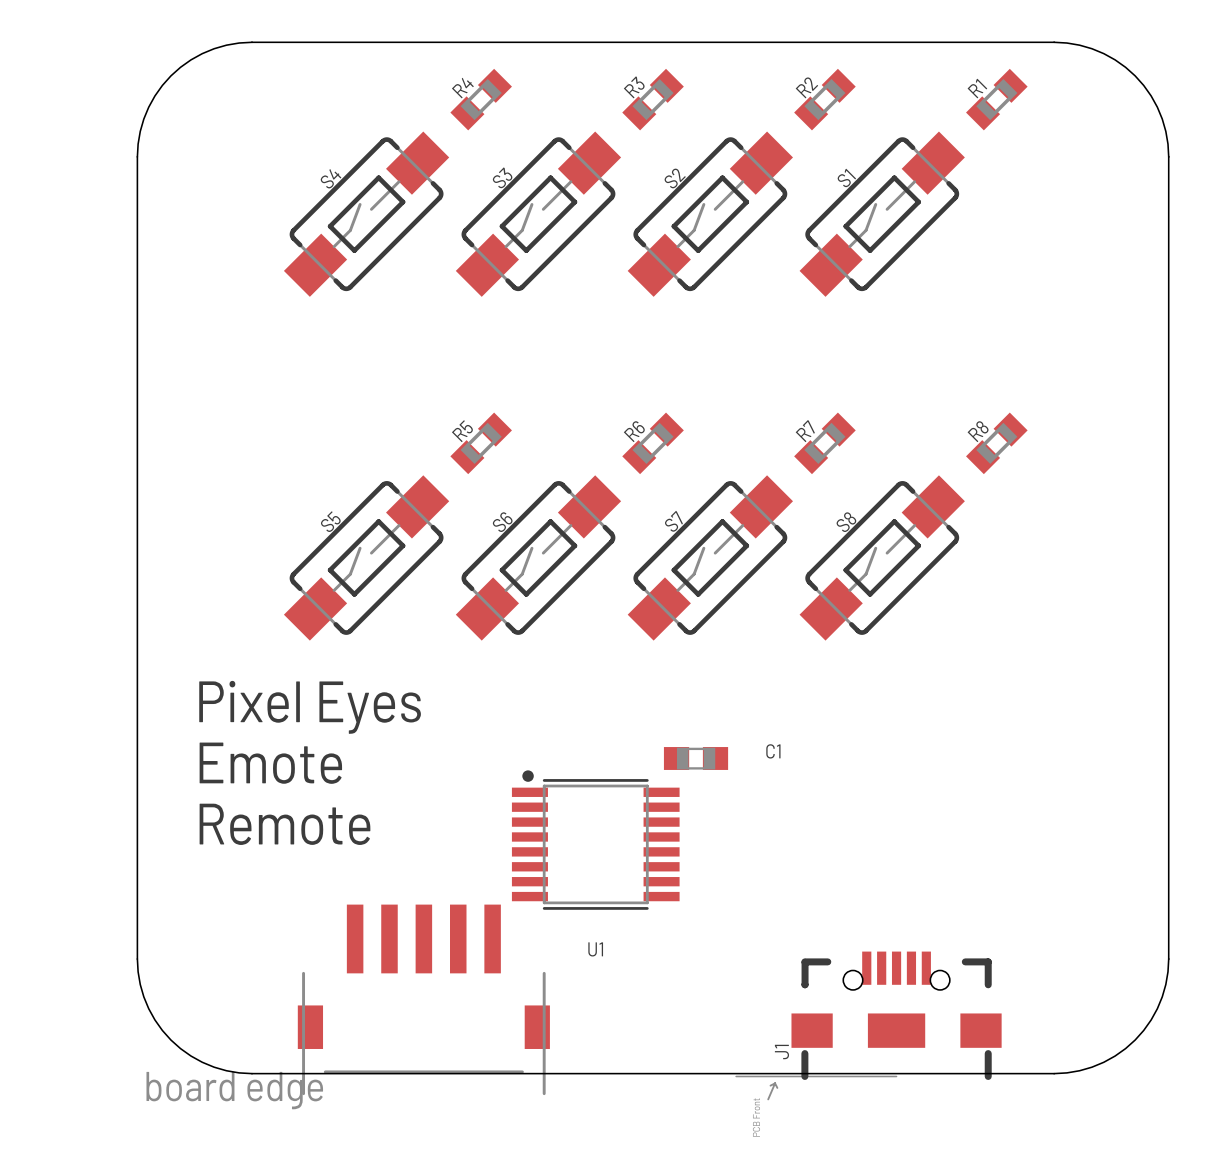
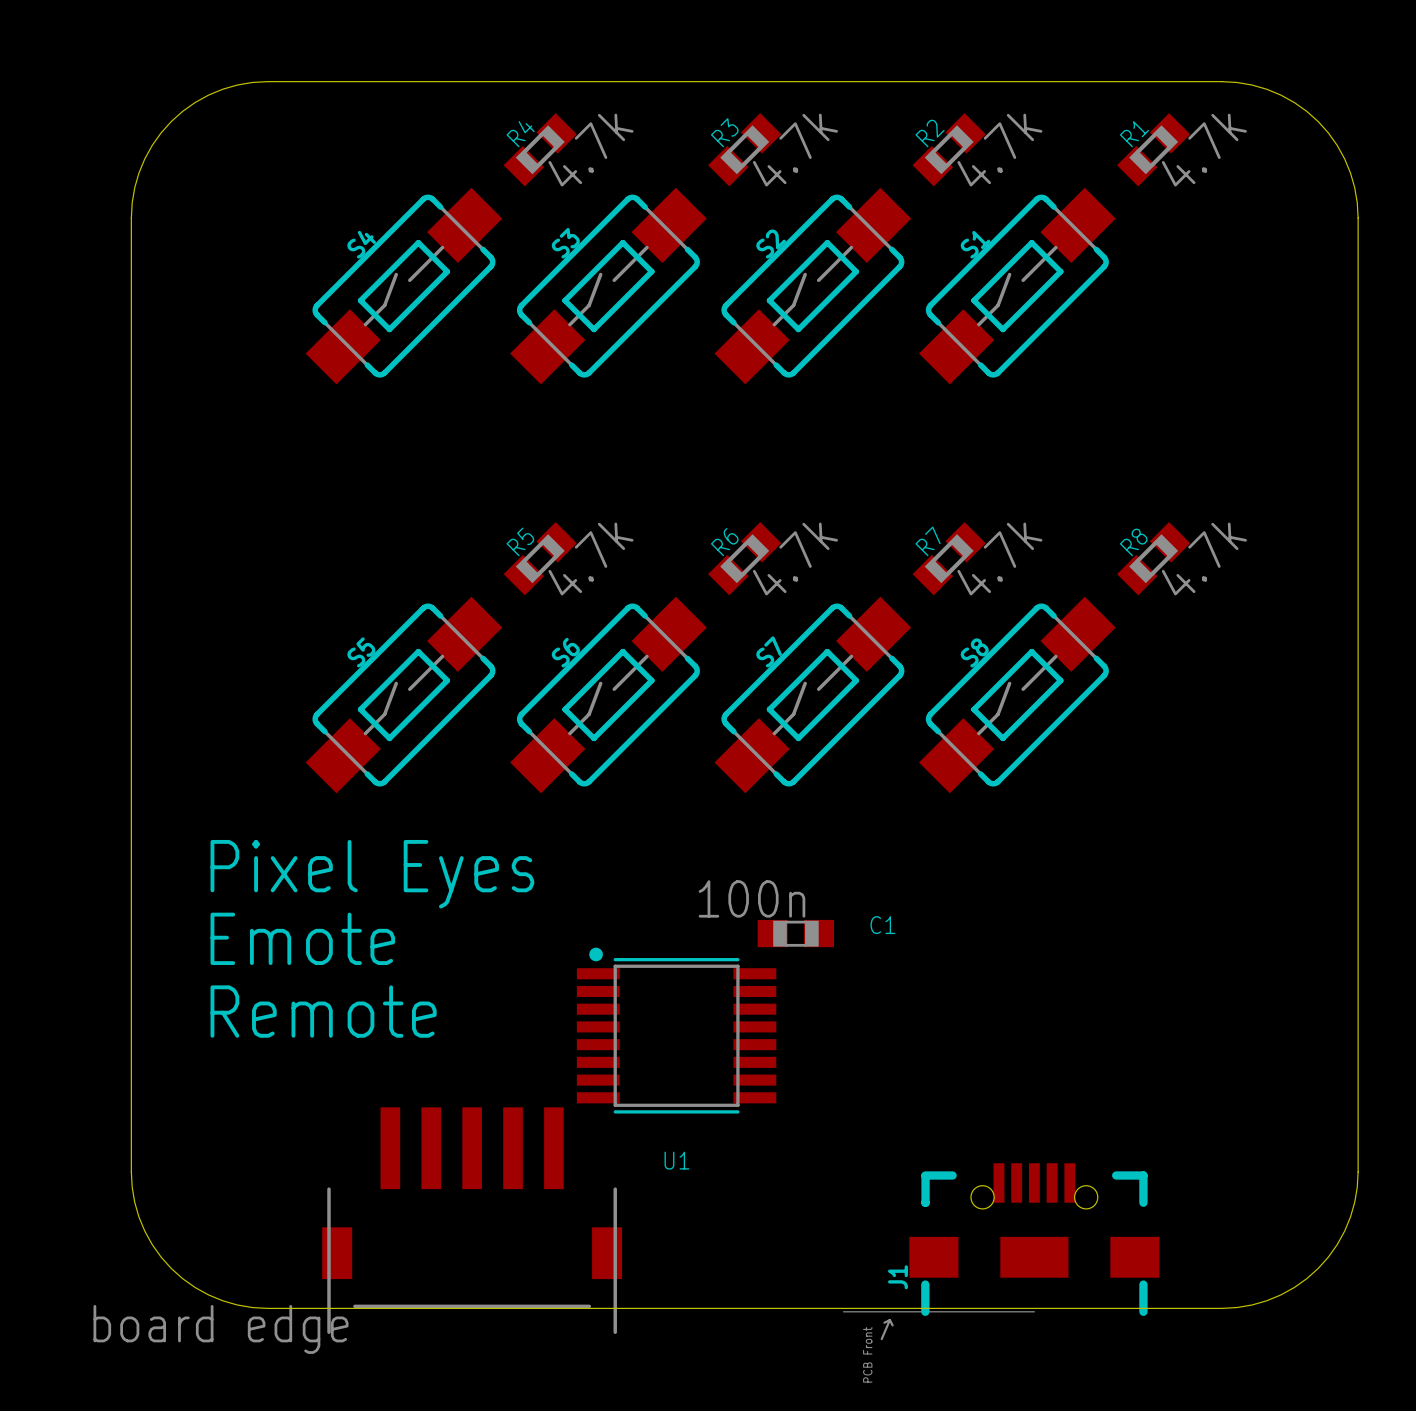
R4 value: none -> 4.7k (590, 150)
R3 value: none -> 4.7k (795, 150)
R2 value: none -> 4.7k (999, 150)
R1 value: none -> 4.7k (1204, 150)
R5 value: none -> 4.7k (590, 558)
R6 value: none -> 4.7k (795, 558)
R7 value: none -> 4.7k (999, 558)
R8 value: none -> 4.7k (1204, 558)
C1 value: none -> 100n (751, 898)

